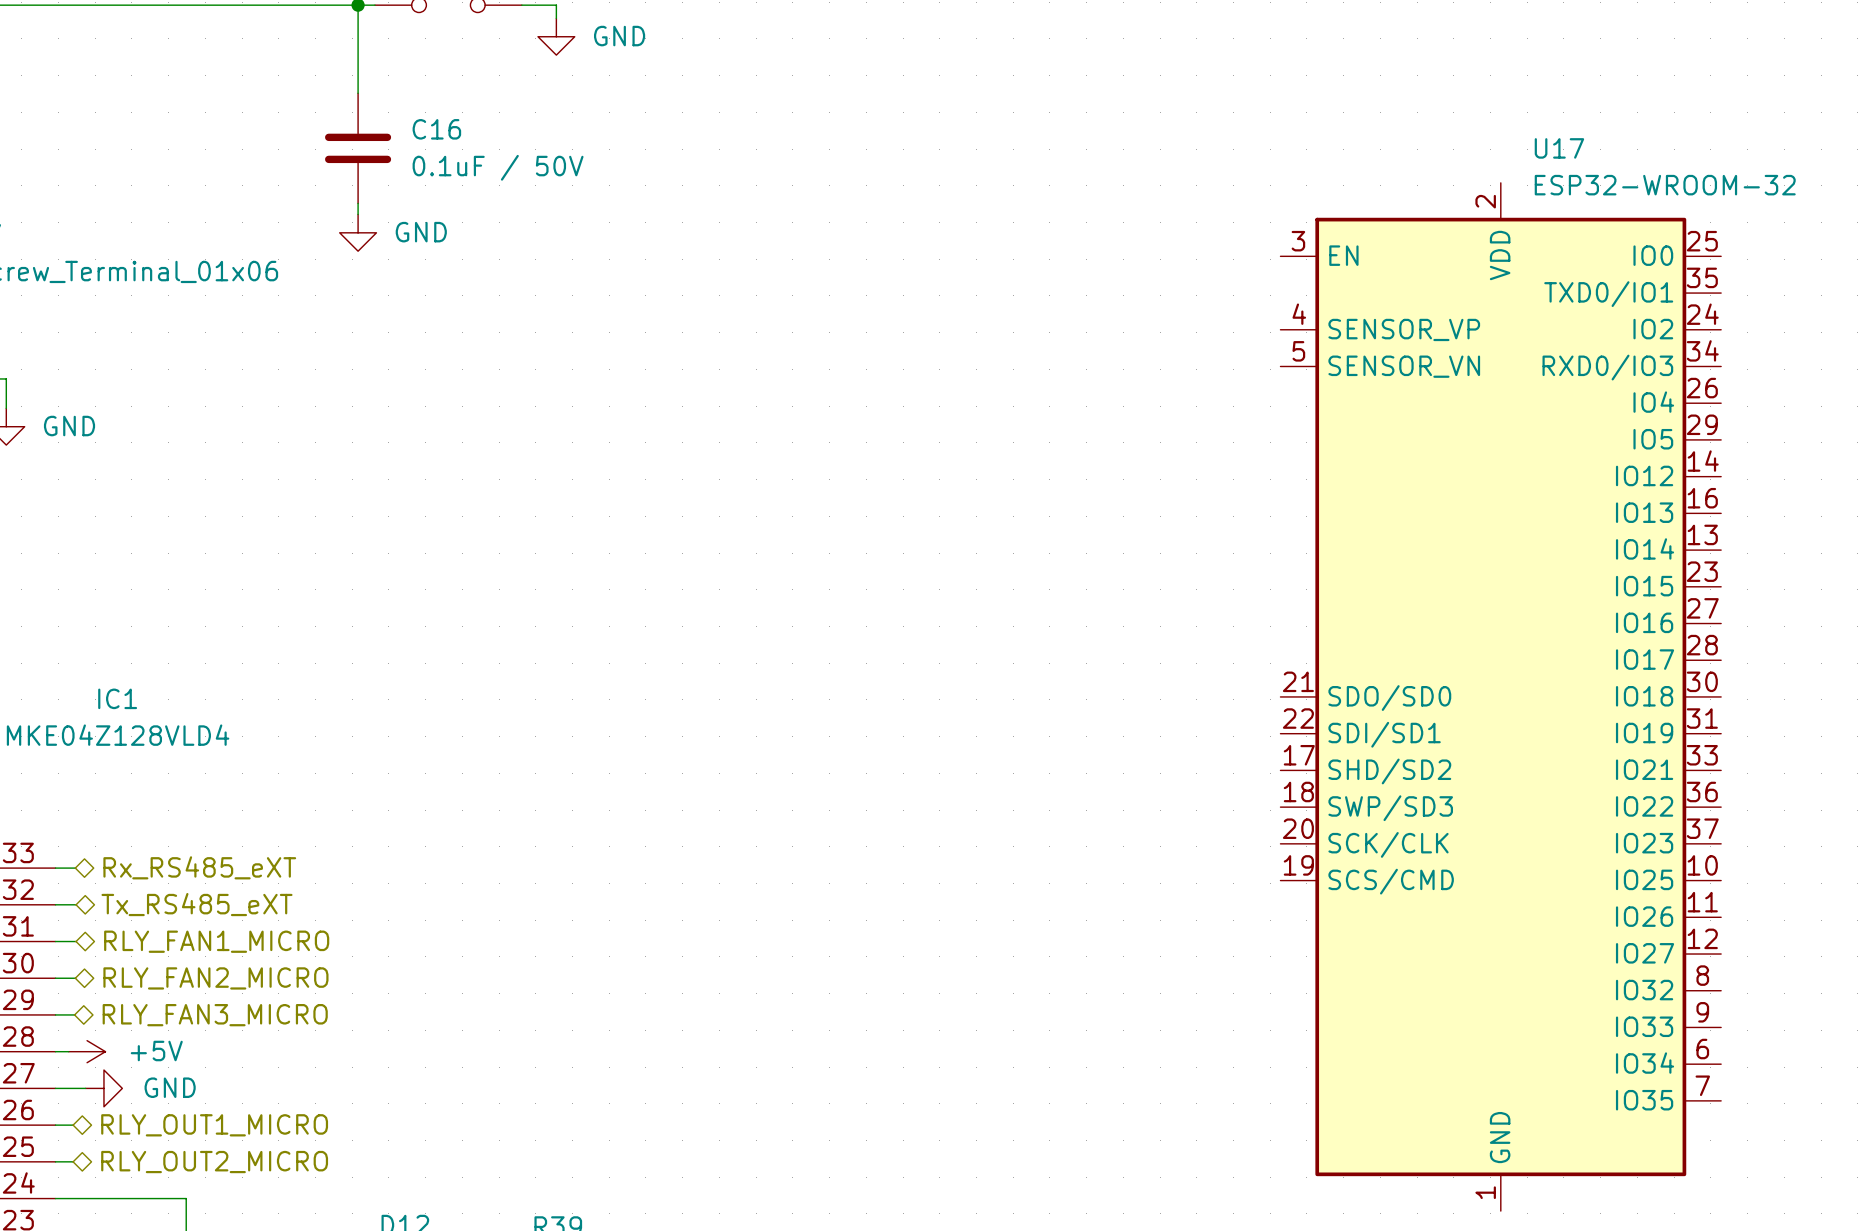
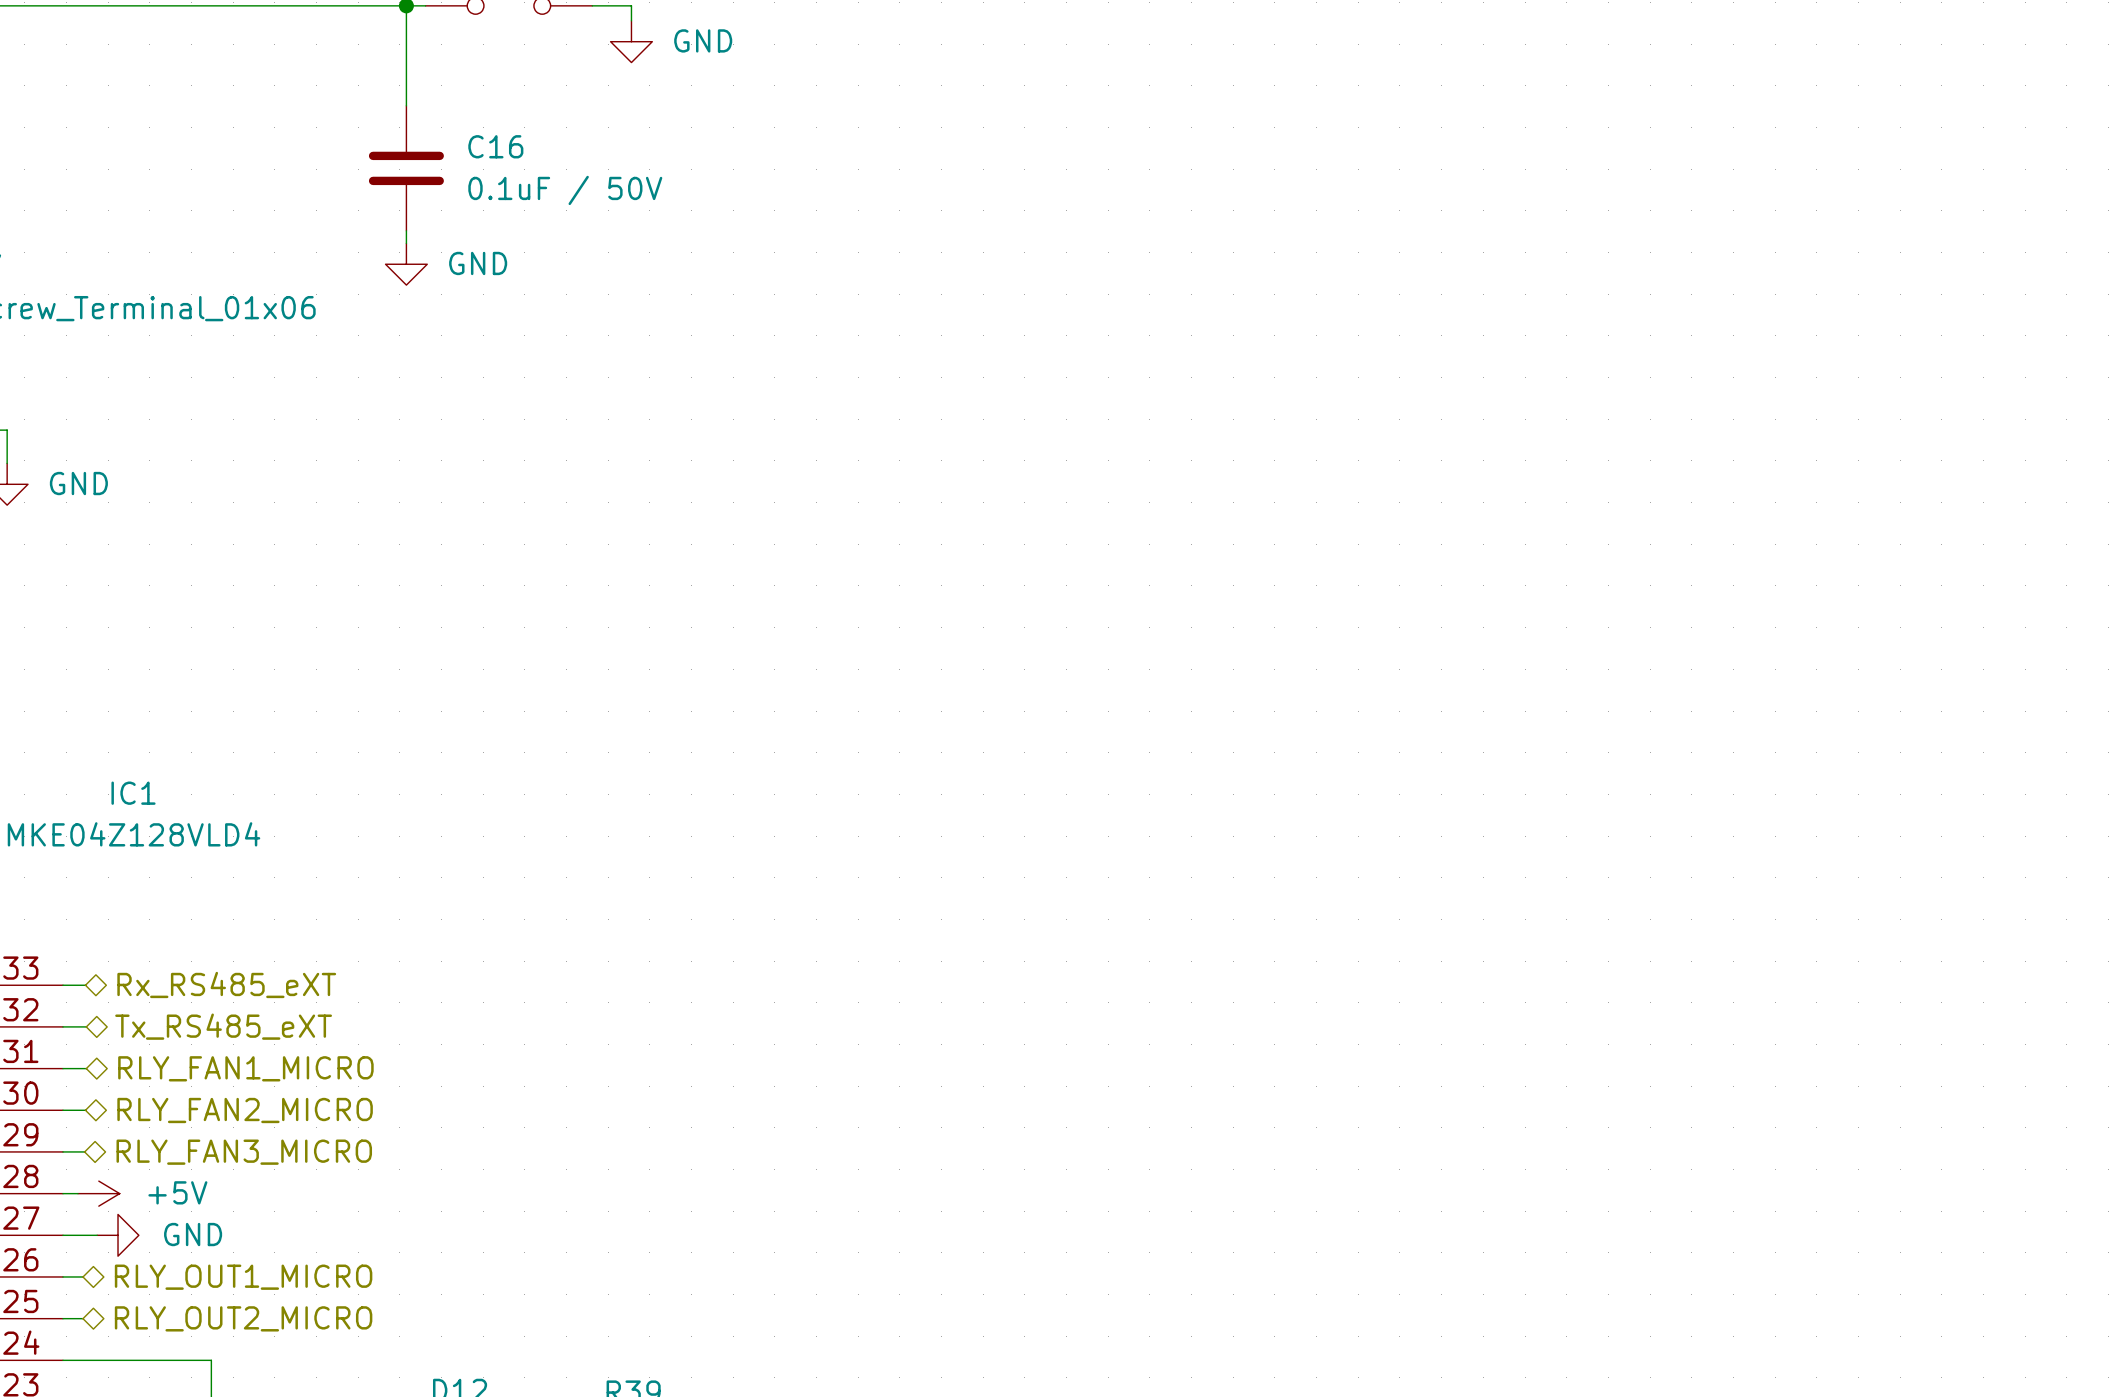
U17: ESP32-WROOM-32 (1500, 696) -> none

